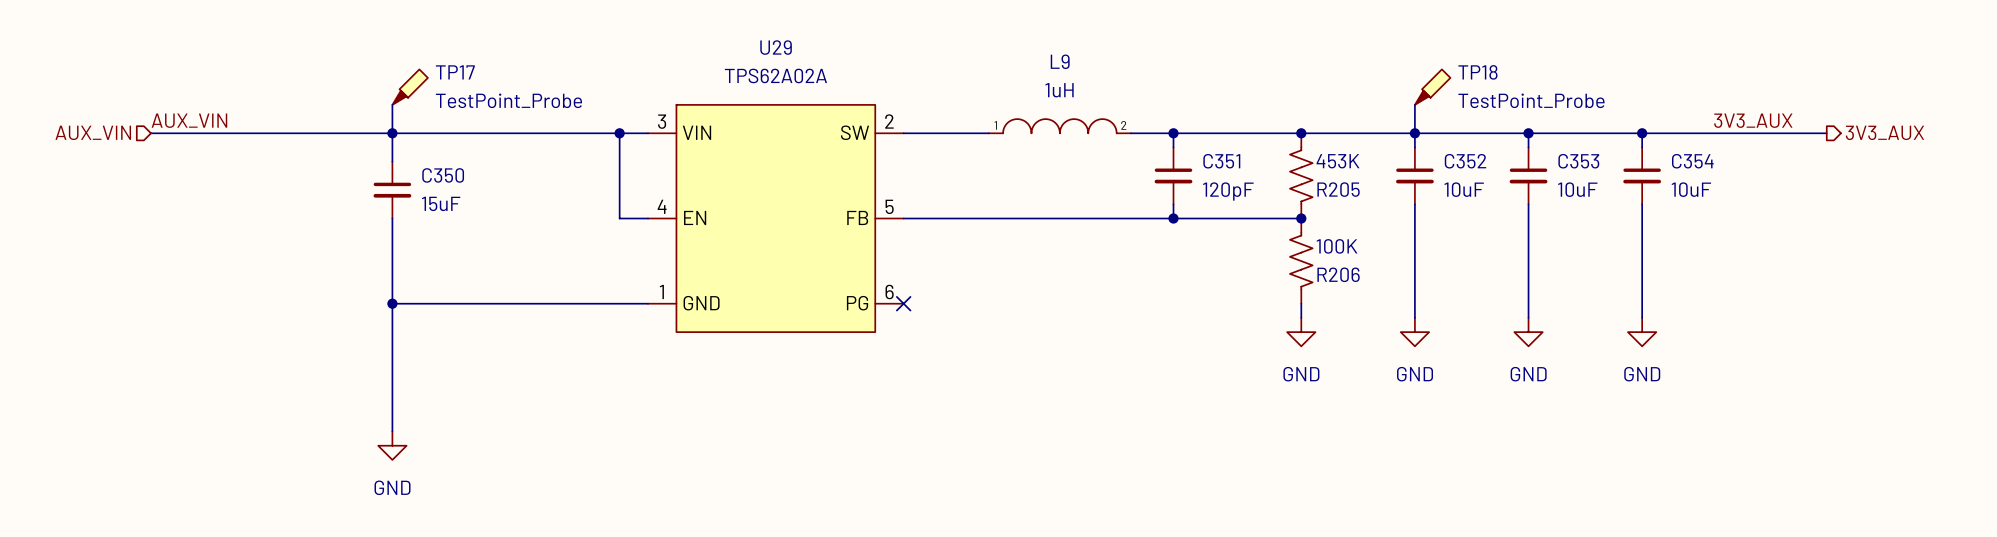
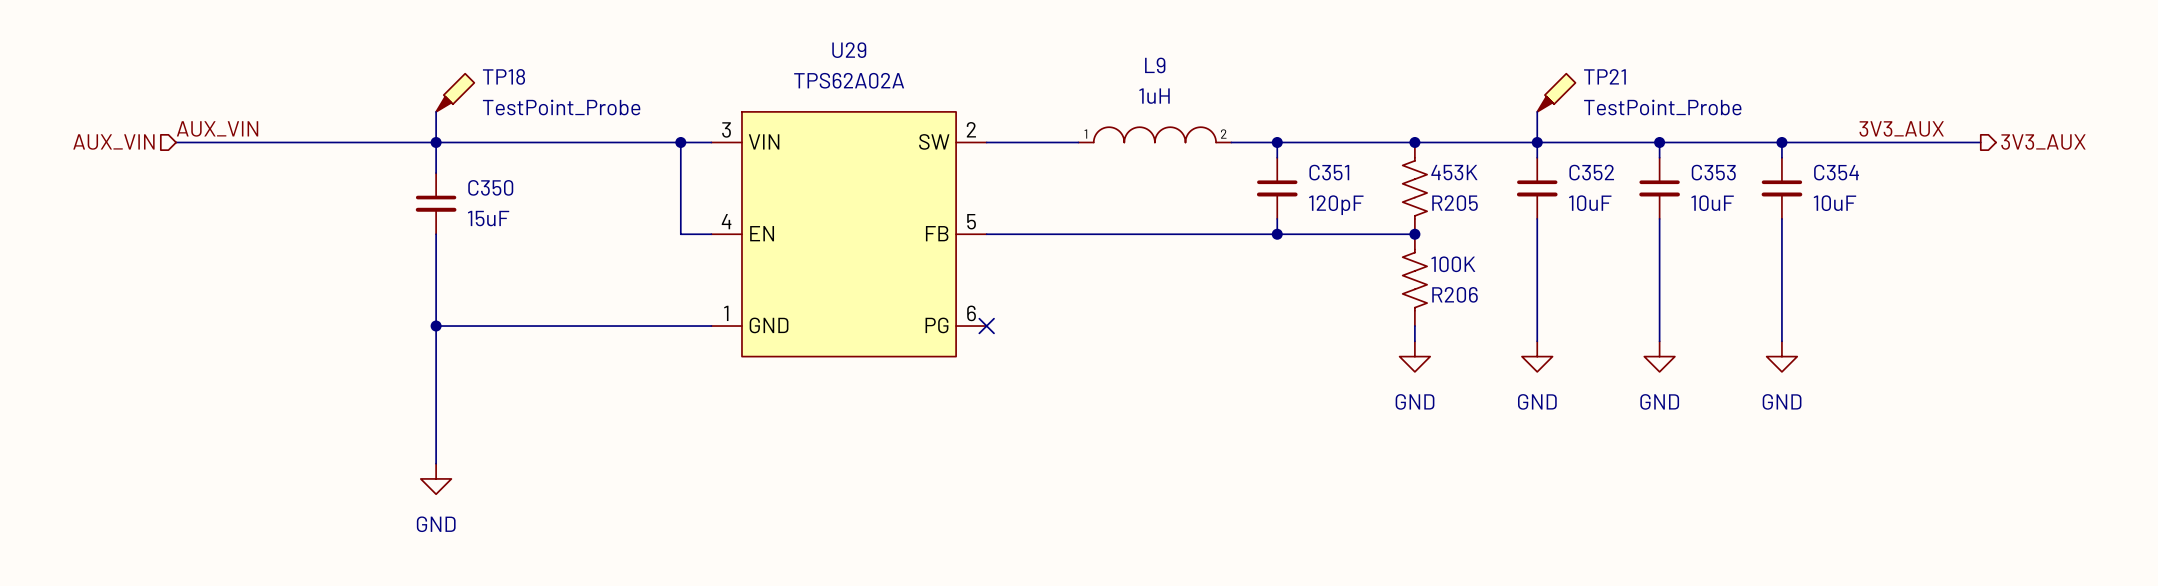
TP17 name: TP17 (455, 72) -> TP18 (503, 76)
TP18 name: TP18 (1477, 72) -> TP21 (1604, 76)

